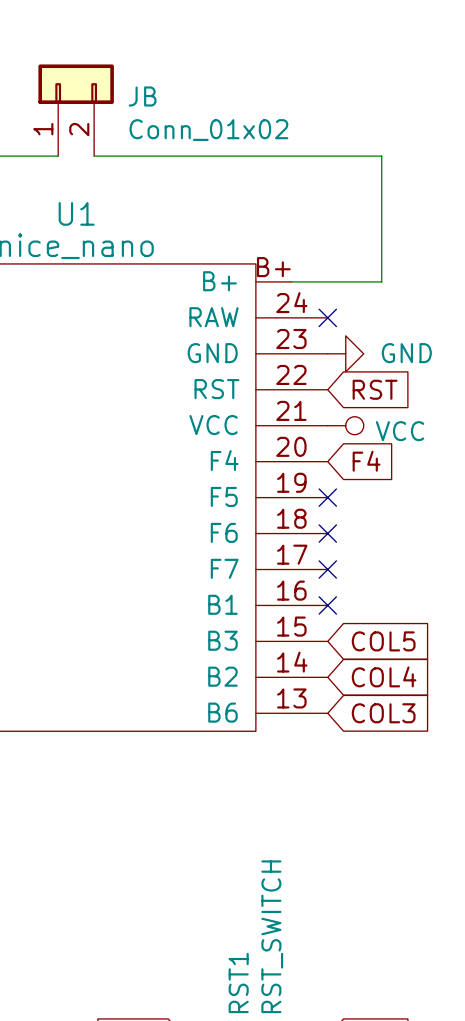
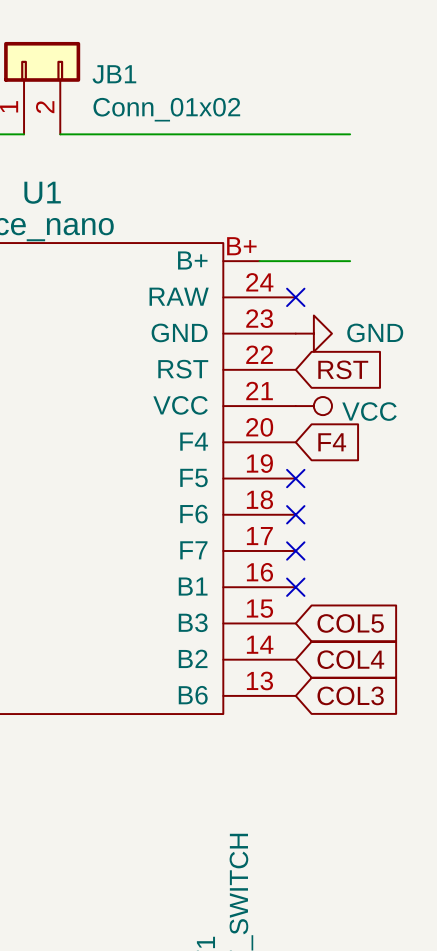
JB name: JB (142, 96) -> JB1 (114, 74)
wire: (381, 156) (381, 281) -> none

